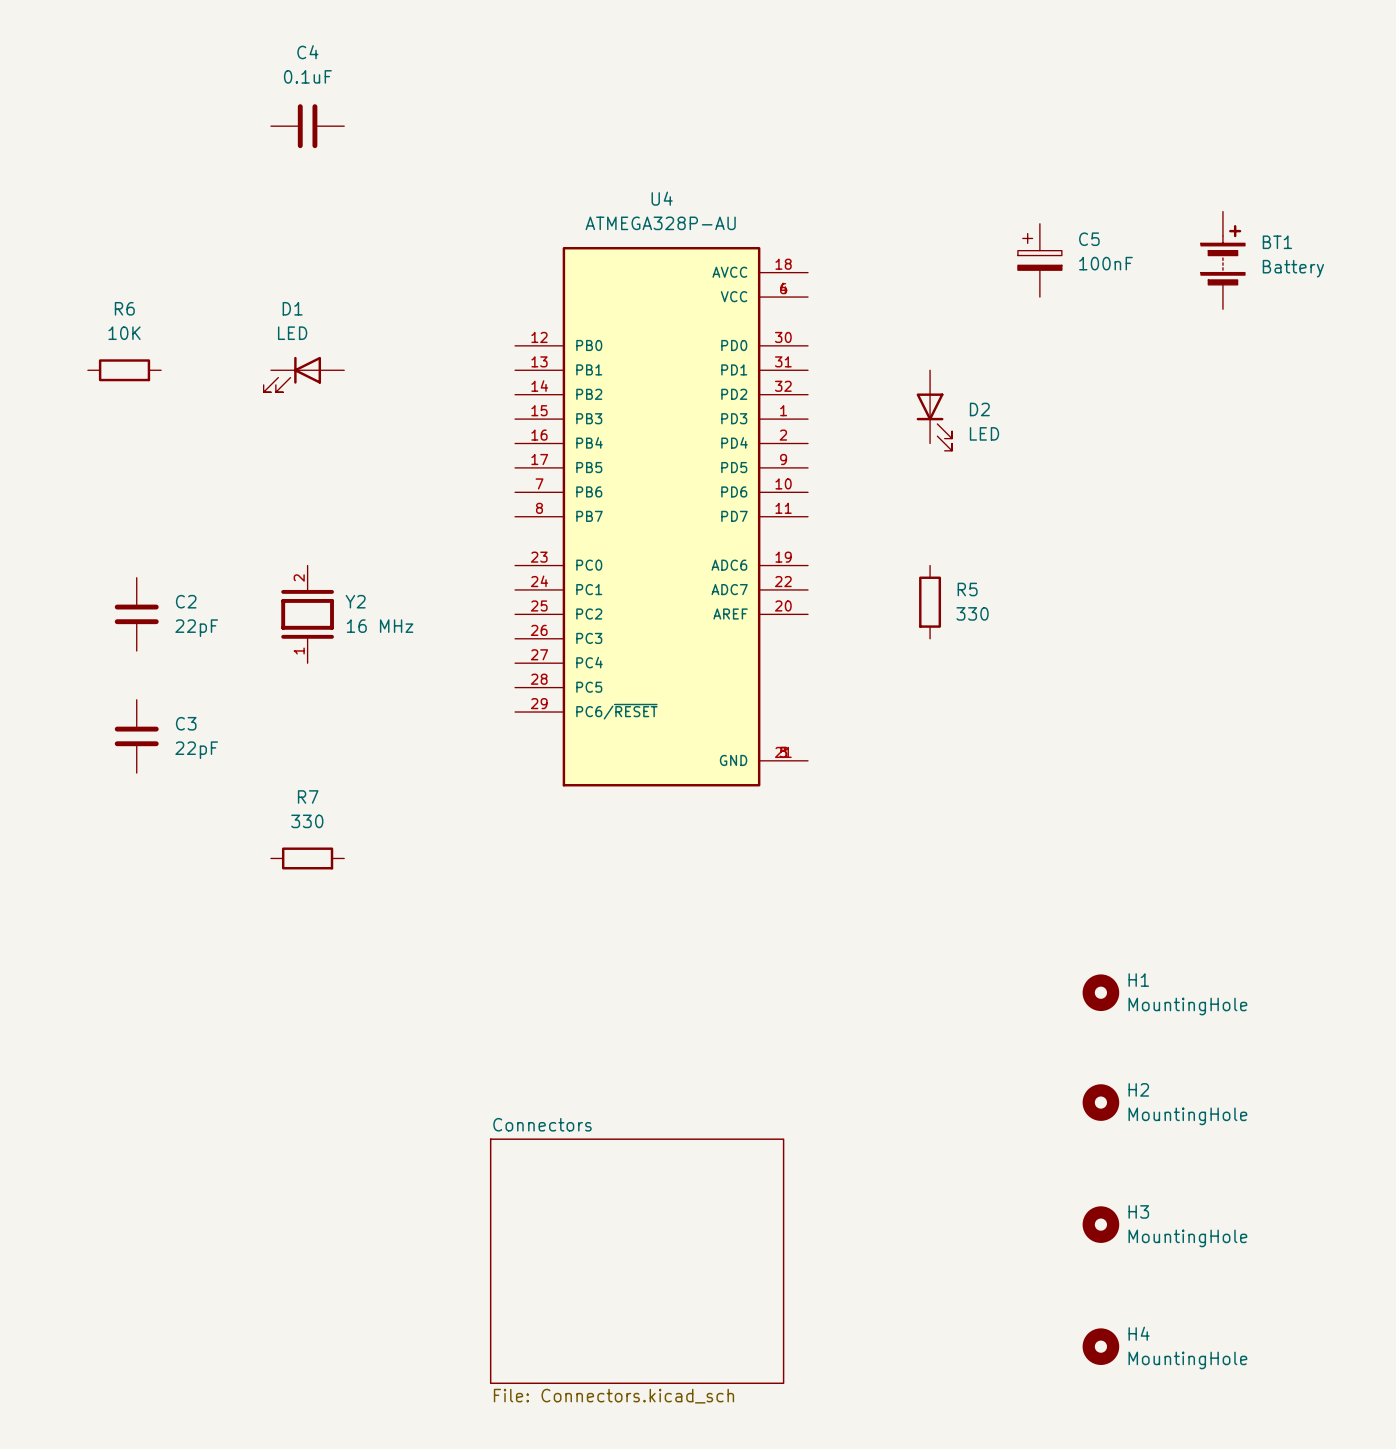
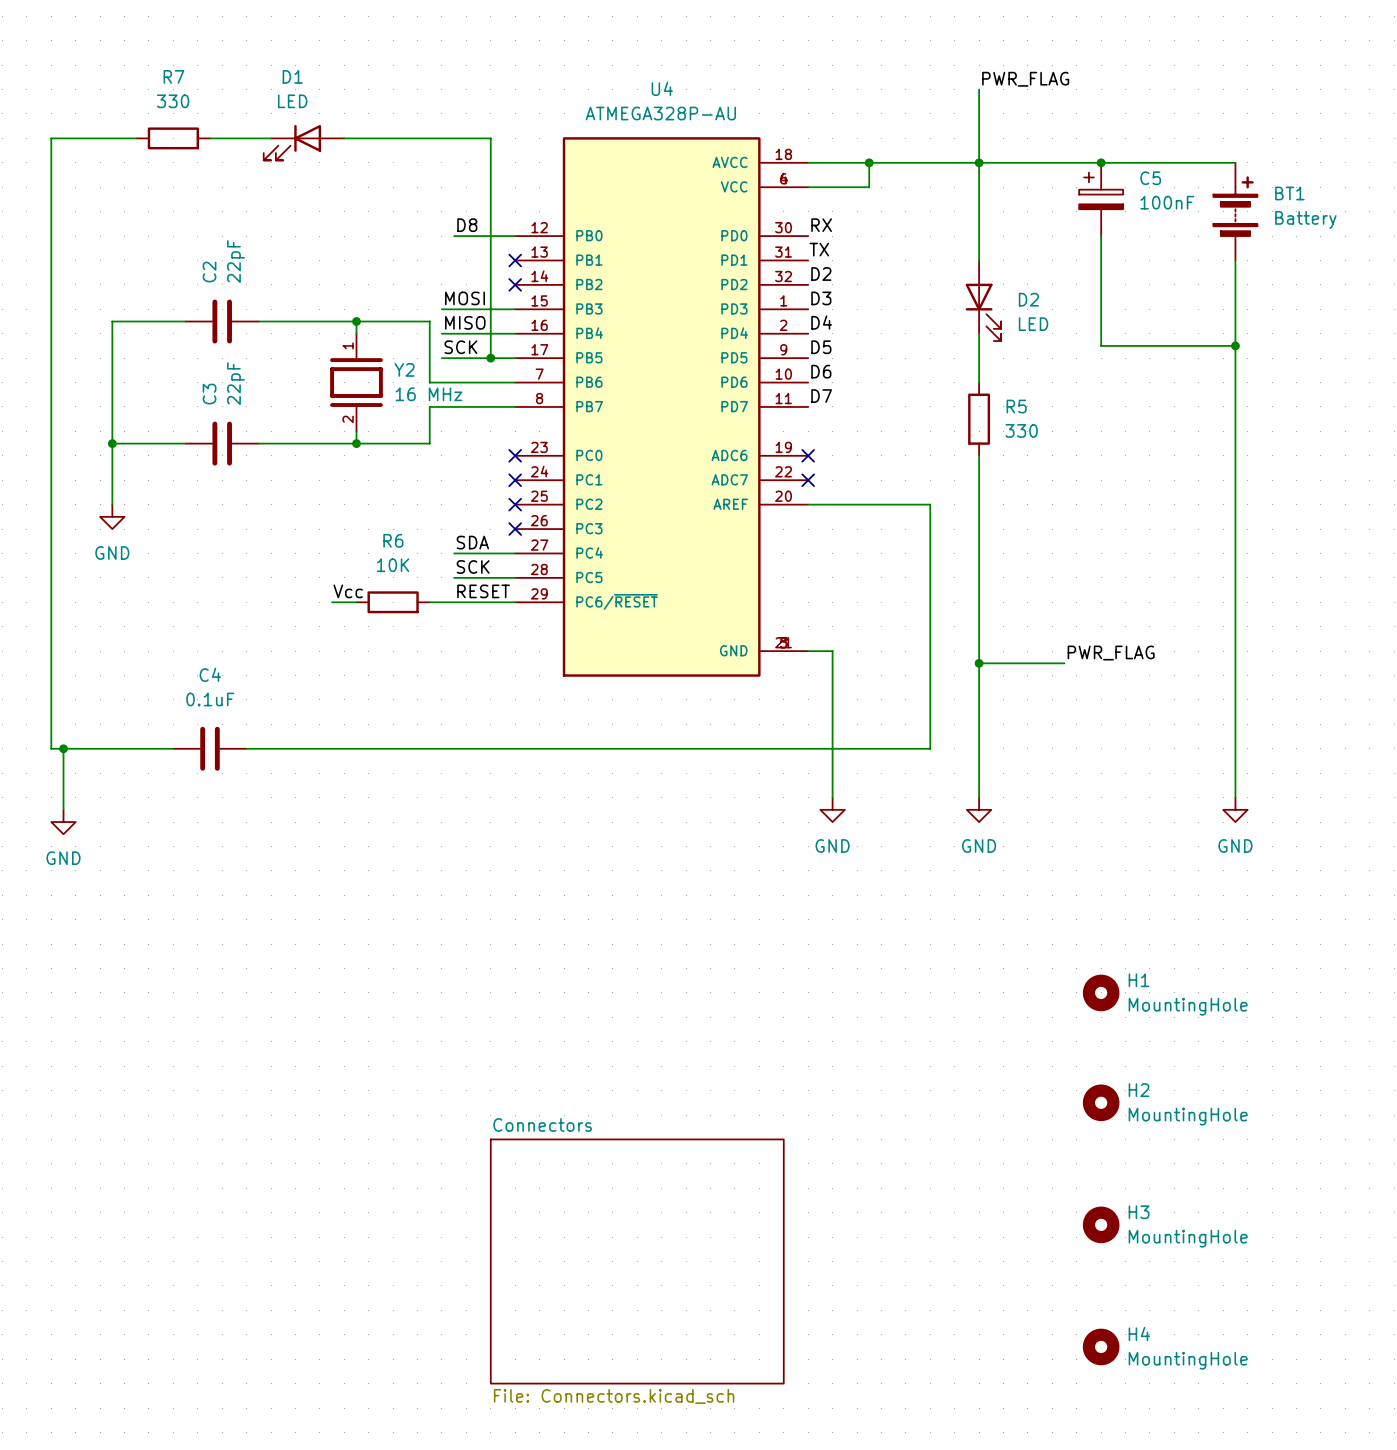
label: none -> PWR_FLAG (1025, 79)
wire: none -> (979, 89) (979, 260)
C4 position: (307, 126) -> (210, 748)
wire: none -> (136, 138) (51, 138) (51, 748) (173, 748)
wire: none -> (210, 138) (271, 138)
wire: none -> (344, 138) (490, 138) (490, 358)
wire: none -> (808, 162) (1235, 162)
wire: none -> (869, 162) (869, 187) (808, 187)
junction: none -> (869, 162)
junction: none -> (979, 162)
junction: none -> (1101, 162)
label: none -> D8 (467, 225)
label: none -> RX (821, 225)
wire: none -> (454, 236) (515, 236)
wire: none -> (1101, 236) (1101, 345) (1235, 345)
label: none -> TX (819, 249)
no-connect mark: none -> (515, 260)
C5 position: (1039, 260) -> (1101, 199)
BT1 position: (1222, 260) -> (1235, 211)
wire: none -> (1235, 260) (1235, 797)
label: none -> D2 (821, 274)
no-connect mark: none -> (515, 284)
label: none -> MOSI (465, 298)
label: none -> D3 (821, 298)
wire: none -> (441, 309) (515, 309)
wire: none -> (185, 321) (112, 321) (112, 504)
wire: none -> (258, 321) (429, 321) (429, 382) (515, 382)
wire: none -> (356, 321) (356, 333)
junction: none -> (356, 321)
label: none -> MISO (465, 322)
label: none -> D4 (821, 322)
wire: none -> (441, 333) (515, 333)
wire: none -> (979, 333) (979, 382)
junction: none -> (1235, 345)
label: none -> SCK (460, 347)
label: none -> D5 (821, 347)
wire: none -> (441, 358) (515, 358)
junction: none -> (490, 358)
R6 position: (124, 370) -> (393, 602)
label: none -> D6 (821, 371)
D1 position: (303, 374) -> (304, 142)
label: none -> D7 (821, 396)
wire: none -> (515, 406) (429, 406) (429, 443) (258, 443)
D2 position: (934, 410) -> (983, 300)
wire: none -> (356, 431) (356, 443)
wire: none -> (112, 443) (185, 443)
junction: none -> (112, 443)
junction: none -> (356, 443)
no-connect mark: none -> (515, 455)
no-connect mark: none -> (808, 455)
wire: none -> (979, 455) (979, 797)
no-connect mark: none -> (515, 480)
no-connect mark: none -> (808, 480)
no-connect mark: none -> (515, 504)
wire: none -> (808, 504) (930, 504) (930, 748) (246, 748)
power symbol: none -> GND (112, 516)
U4 position: (661, 516) -> (661, 406)
no-connect mark: none -> (515, 529)
label: none -> SDA (472, 542)
wire: none -> (454, 553) (515, 553)
label: none -> SCK (473, 566)
wire: none -> (454, 577) (515, 577)
label: none -> Vcc (348, 591)
label: none -> RESET (483, 591)
C2 name position: C2 (186, 601) -> C2 (209, 272)
wire: none -> (332, 602) (356, 602)
wire: none -> (429, 602) (515, 602)
R5 position: (930, 602) -> (979, 419)
C2 rotation: 0° (136, 614) -> 90° clockwise (222, 321)
C2 position: (136, 614) -> (222, 321)
Y2 rotation: 0° (307, 614) -> 180° (356, 382)
Y2 position: (307, 614) -> (356, 382)
C2 value position: 22pF (196, 628) -> 22pF (236, 261)
wire: none -> (808, 651) (832, 651) (832, 797)
label: none -> PWR_FLAG (1111, 653)
wire: none -> (979, 663) (1064, 663)
junction: none -> (979, 663)
C3 name position: C3 (186, 723) -> C3 (209, 394)
C3 rotation: 0° (136, 736) -> 90° clockwise (222, 443)
C3 position: (136, 736) -> (222, 443)
wire: none -> (63, 748) (63, 809)
junction: none -> (63, 748)
C3 value position: 22pF (196, 750) -> 22pF (236, 383)
power symbol: none -> GND (832, 809)
power symbol: none -> GND (979, 809)
power symbol: none -> GND (1235, 809)
power symbol: none -> GND (63, 822)
R7 position: (307, 858) -> (173, 138)

